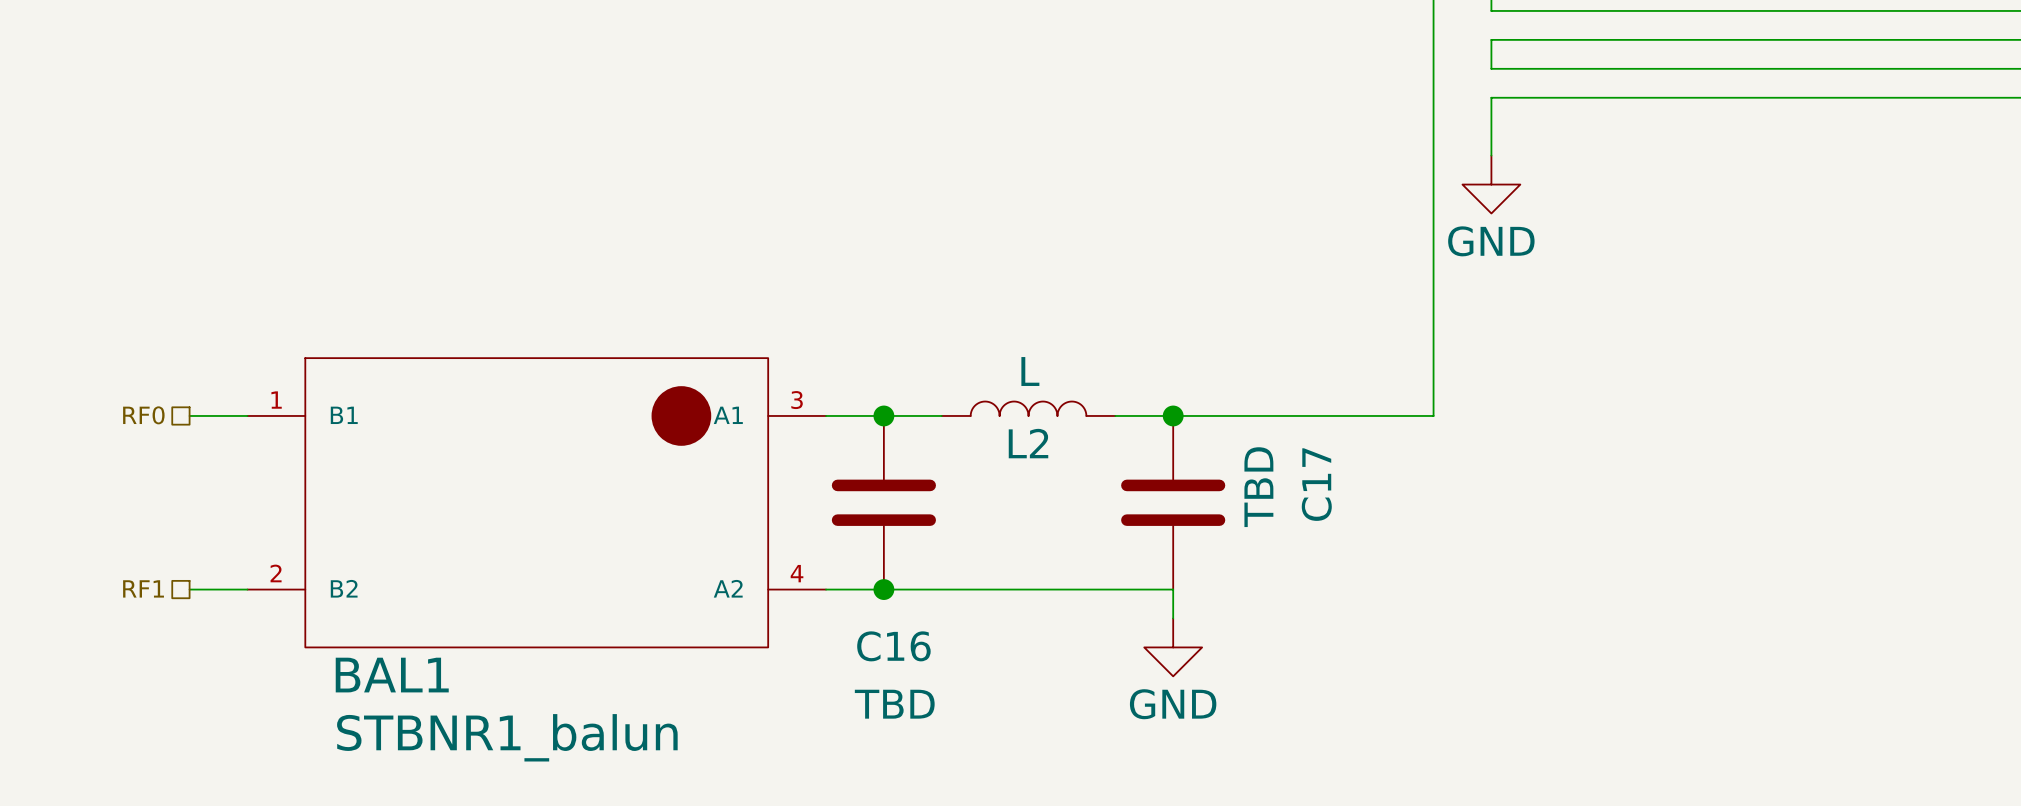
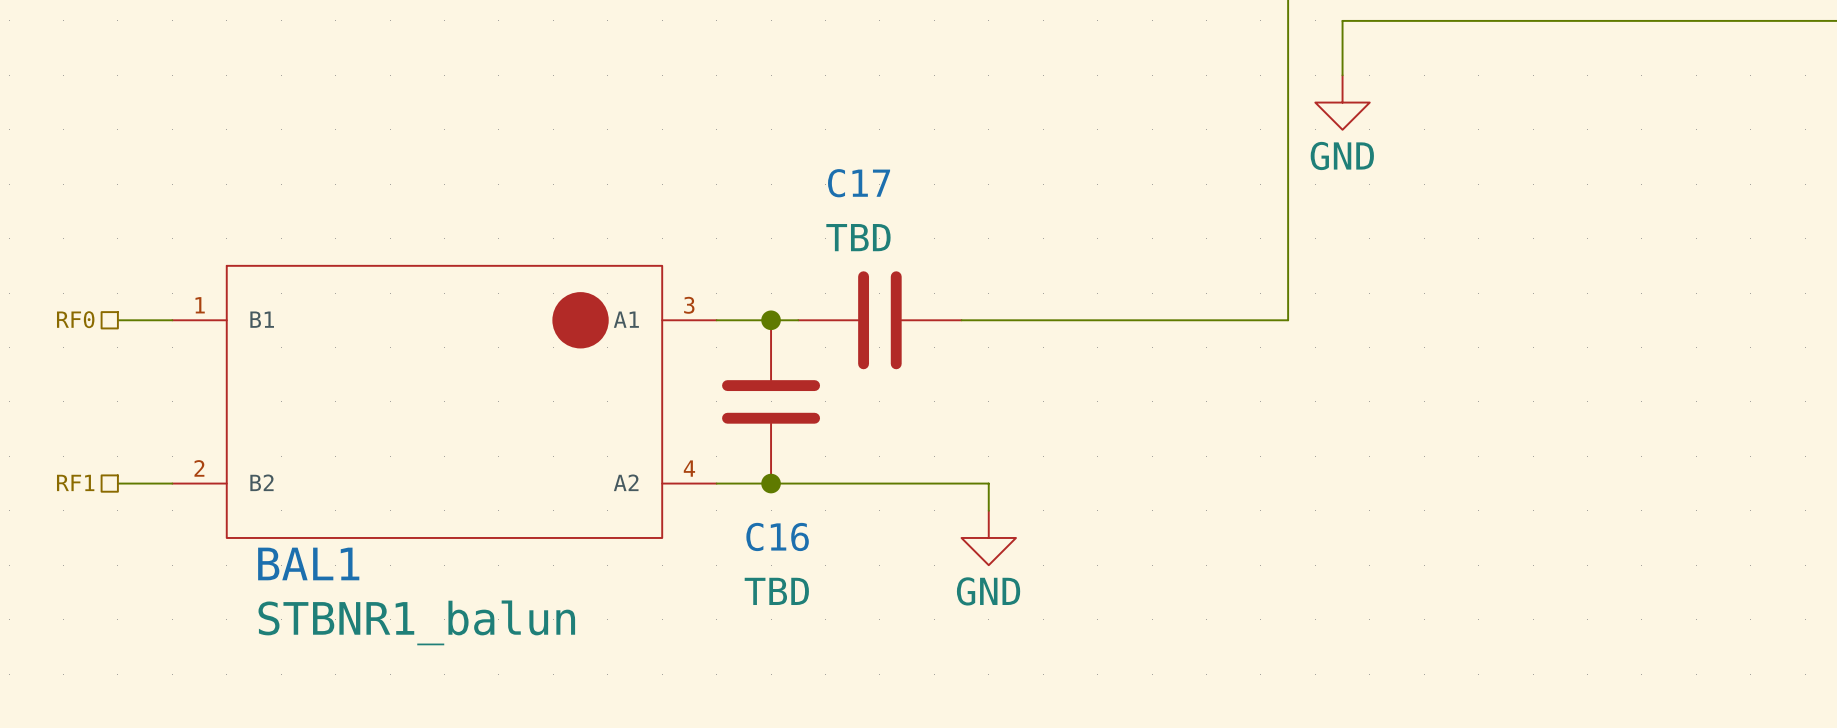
L2: L (1028, 408) -> none
junction: (1173, 415) -> none
C17 name position: C17 (1316, 484) -> C17 (859, 183)
C17 value position: TBD (1258, 487) -> TBD (858, 237)
C17 rotation: 0° (1173, 502) -> 90° clockwise (879, 320)
C17 position: (1173, 502) -> (879, 320)
wire: (1115, 589) (1173, 589) (1173, 618) -> (988, 483) (988, 510)
power symbol position: GND (1173, 647) -> GND (988, 537)

